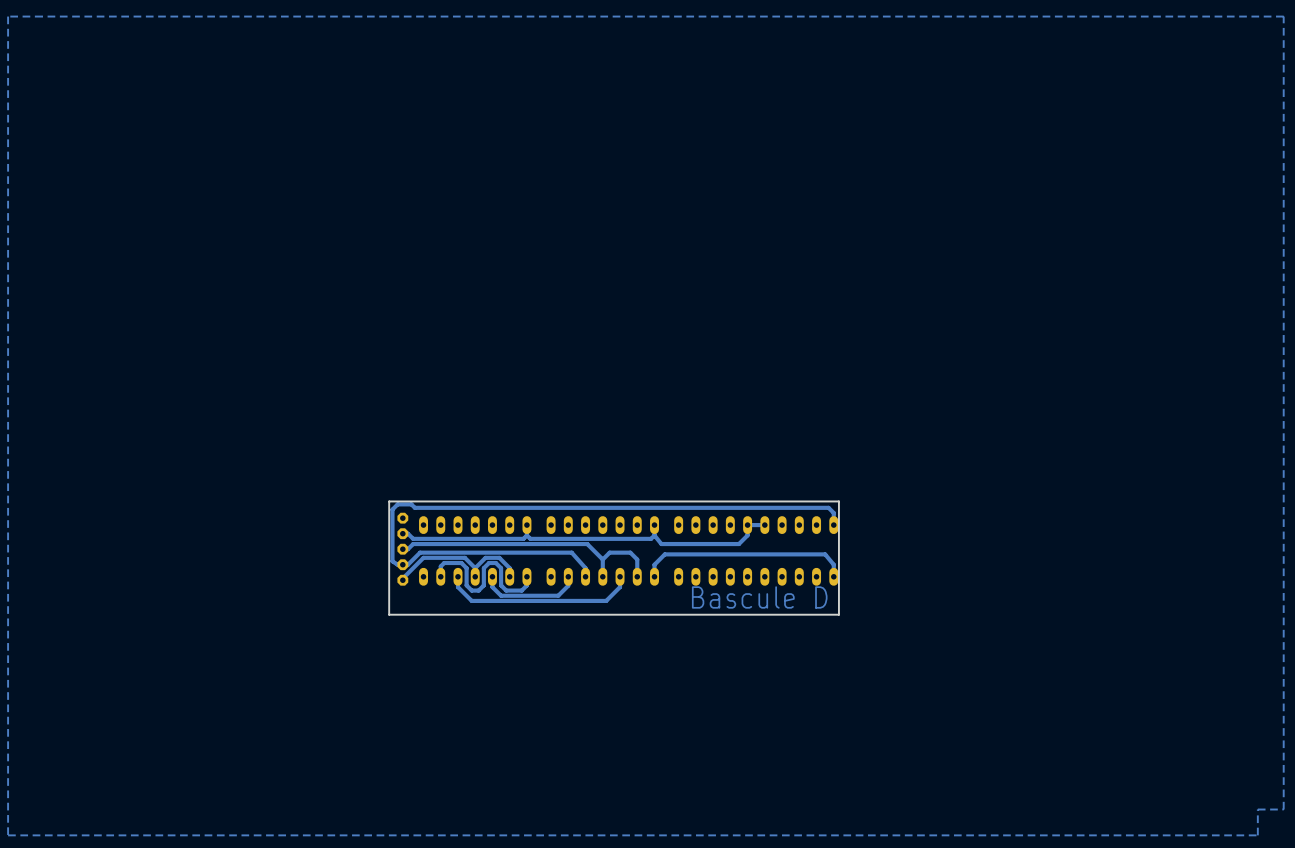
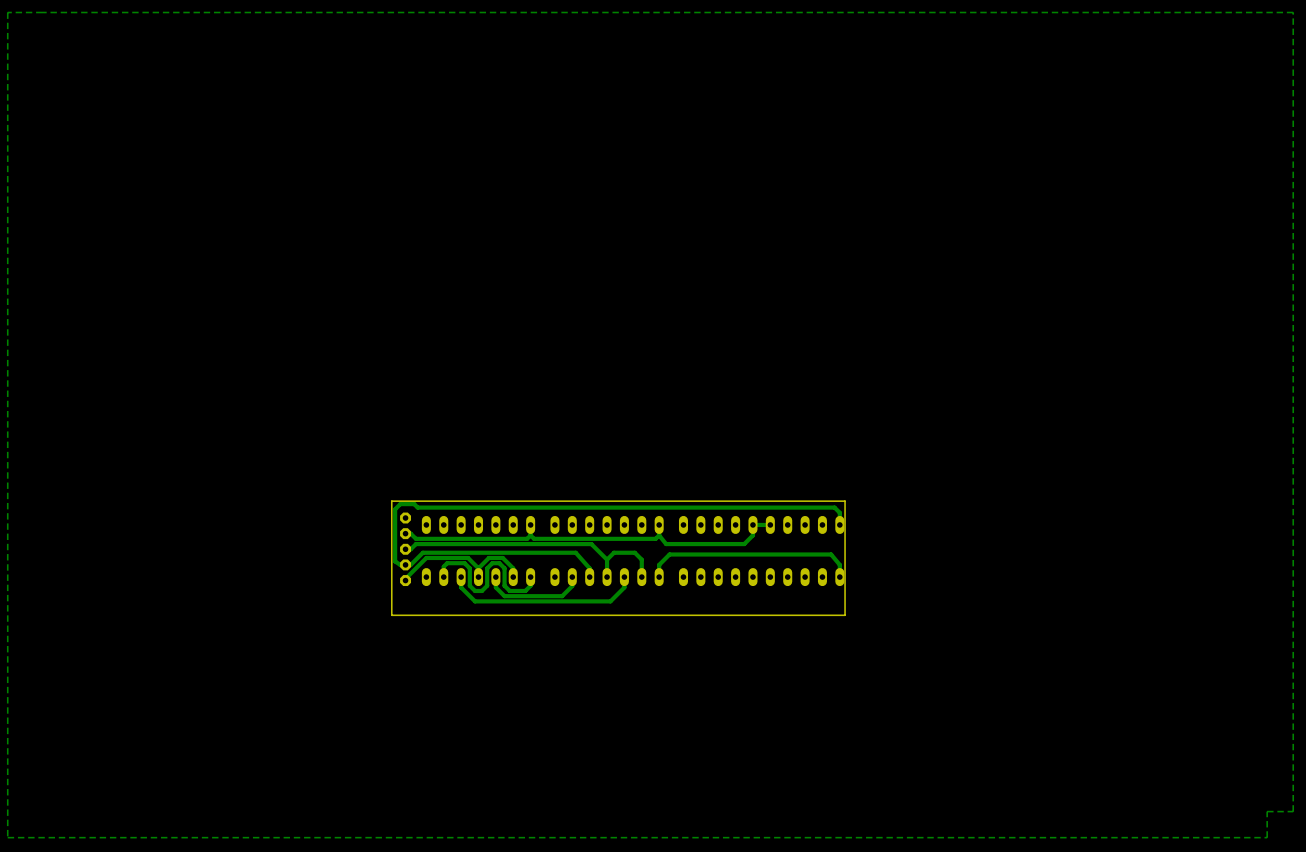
text: Bascule D (759, 597) -> none

